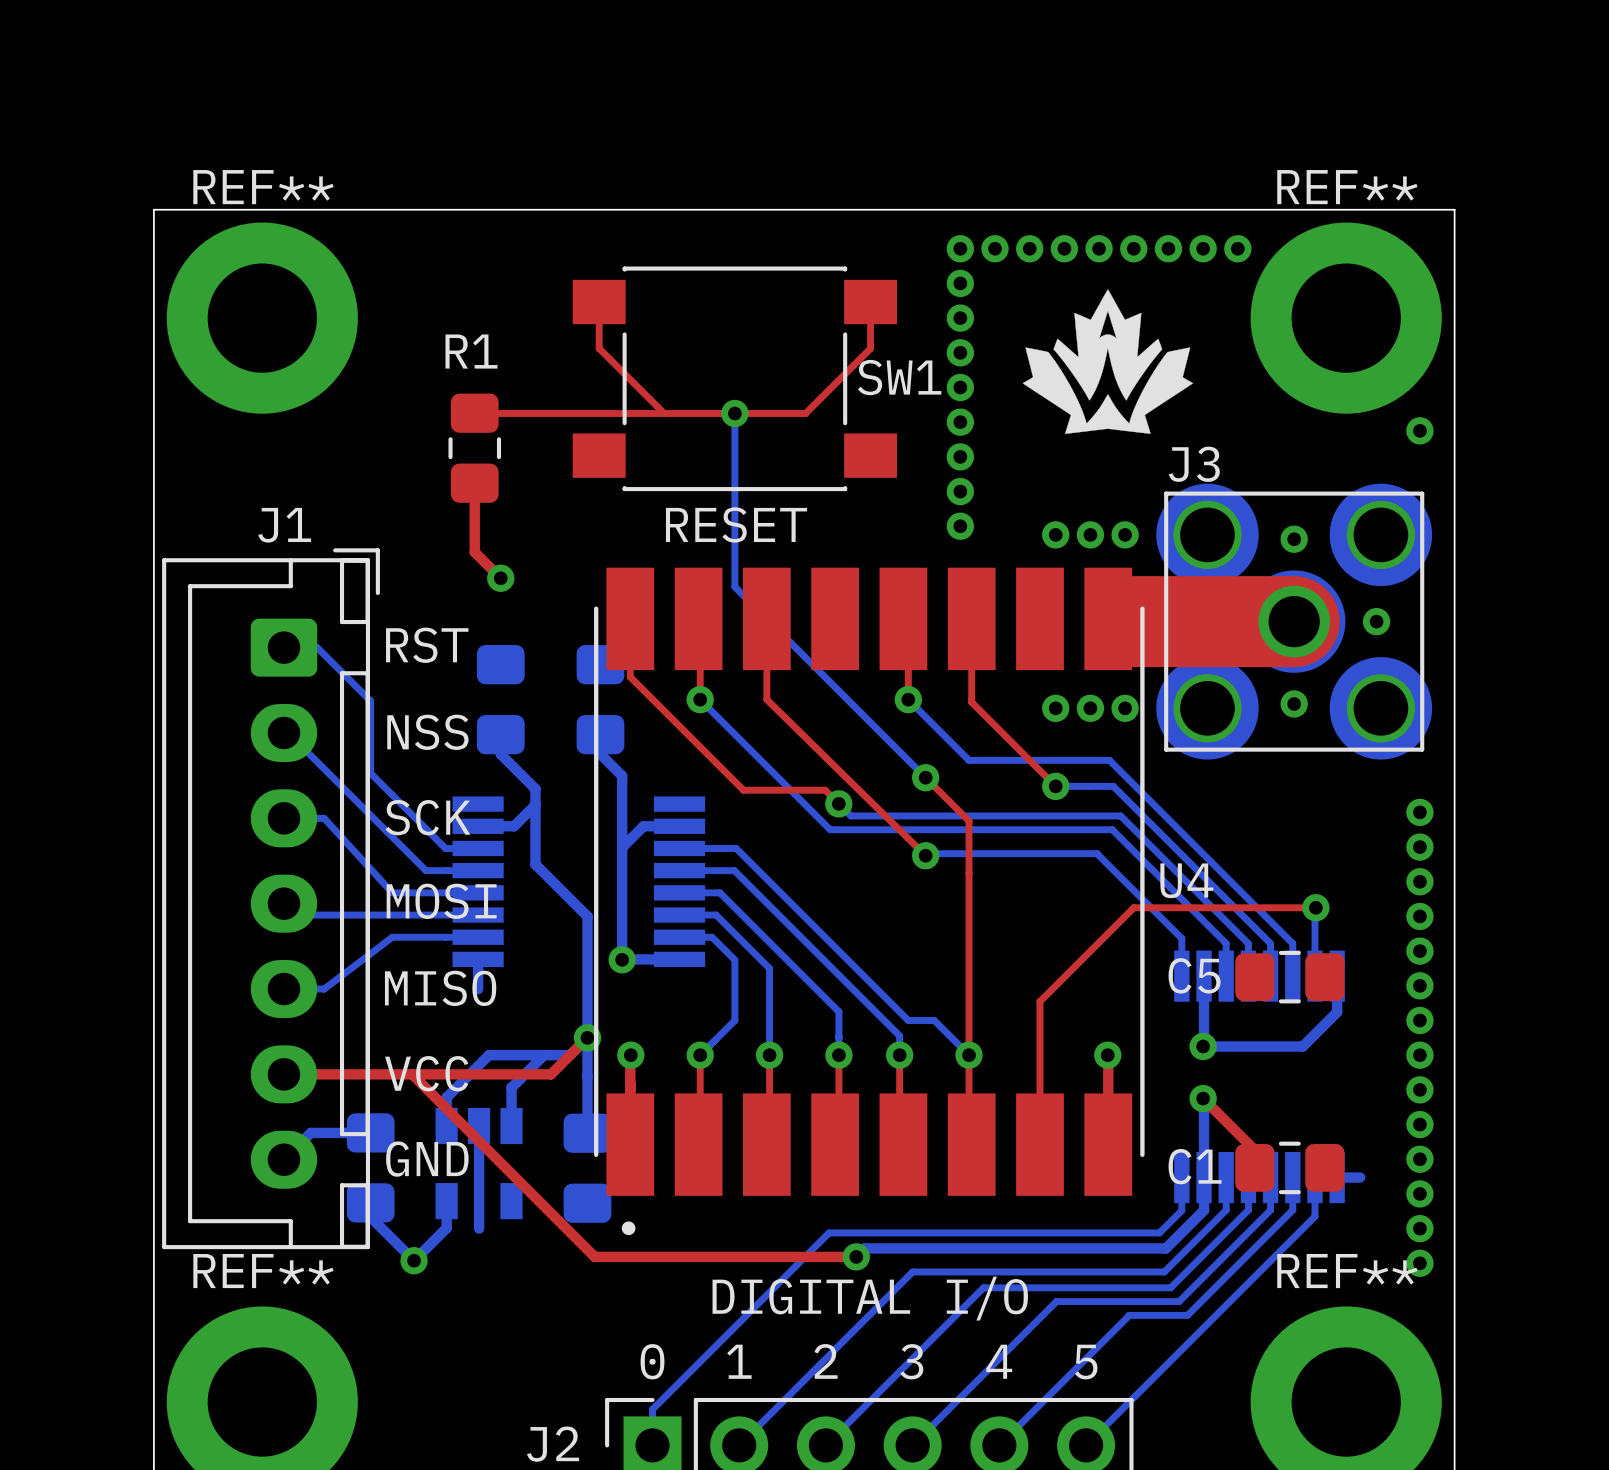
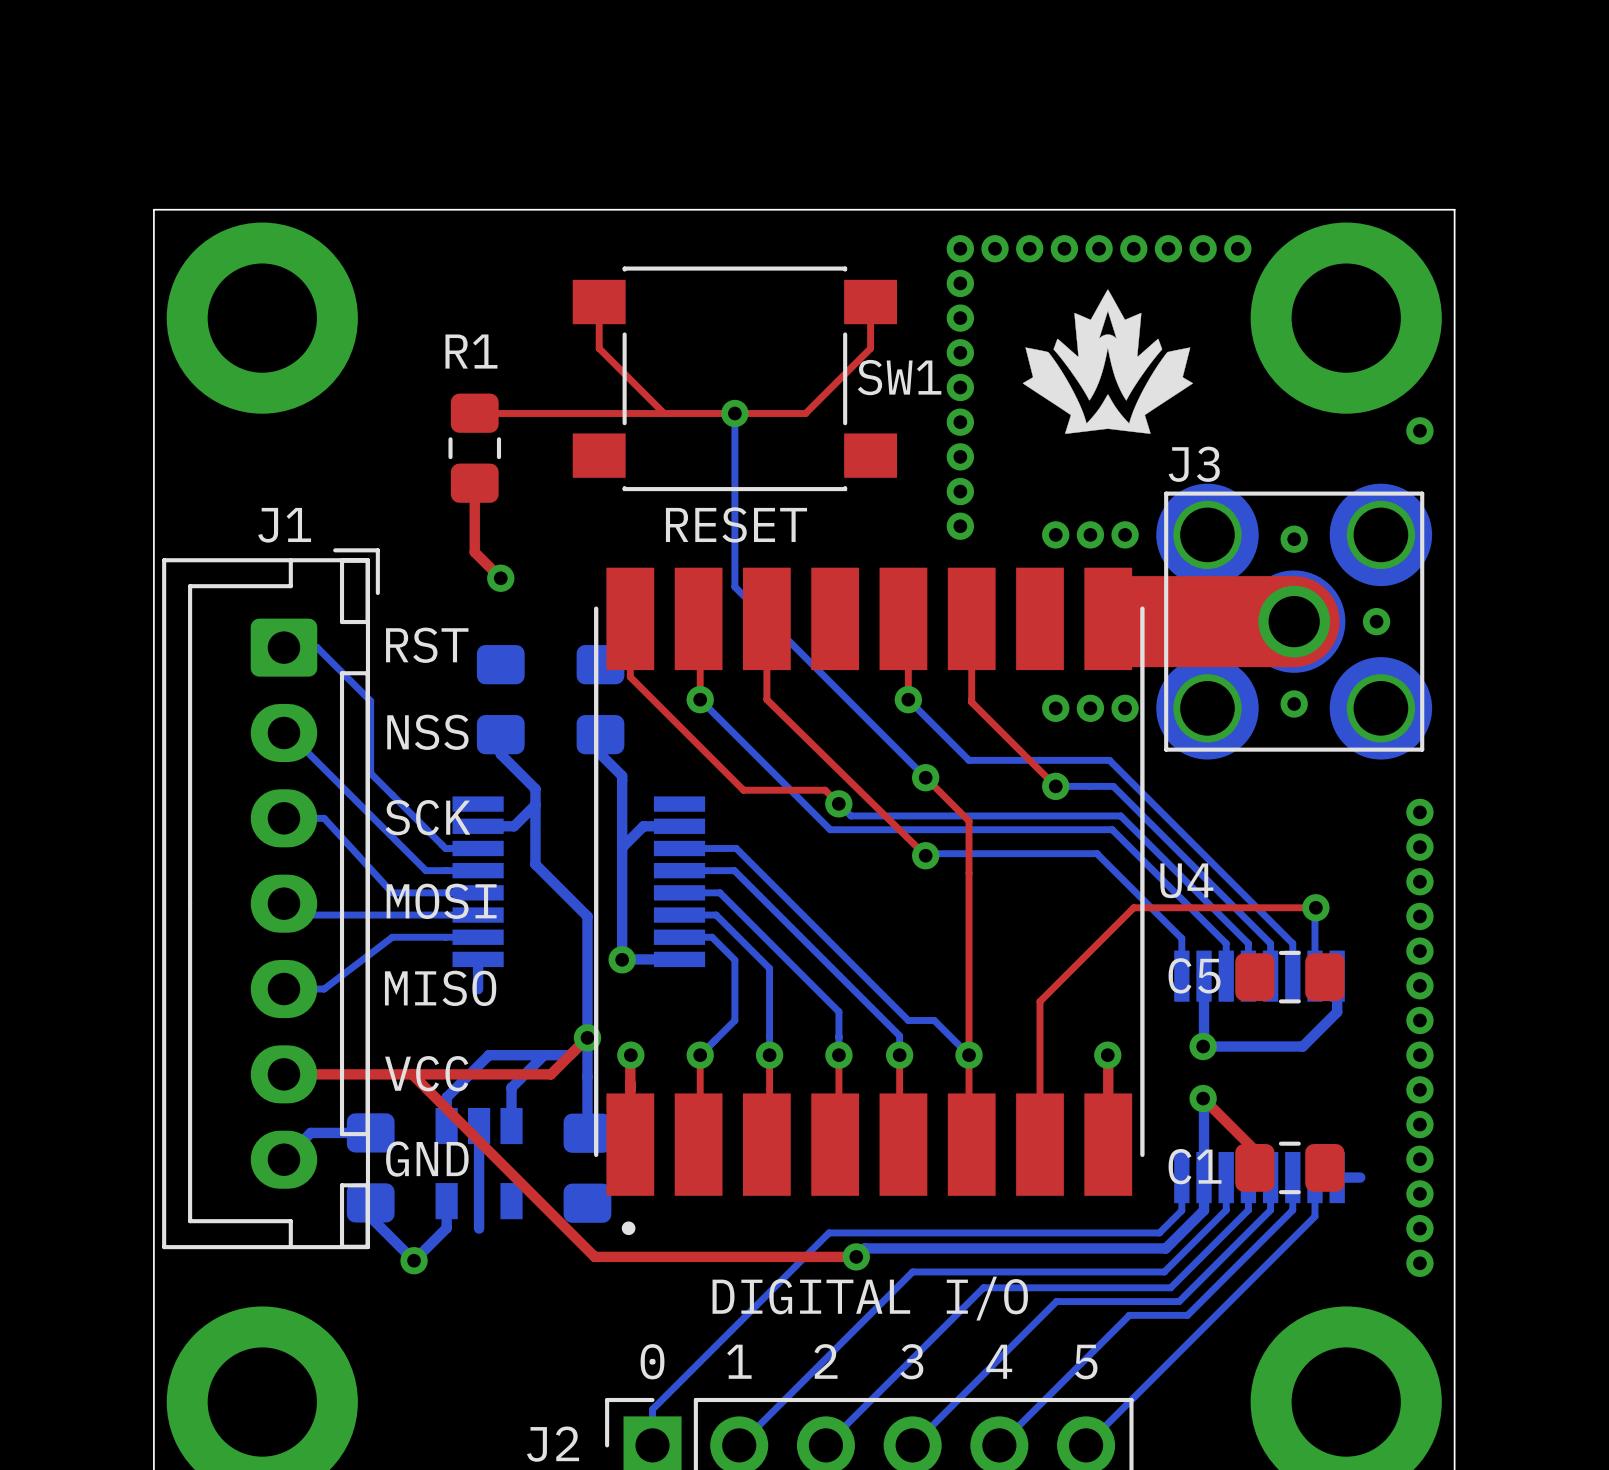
REF** name: REF** (263, 187) -> none
REF** name: REF** (1347, 187) -> none
REF** name: REF** (263, 1271) -> none
REF** name: REF** (1347, 1271) -> none

